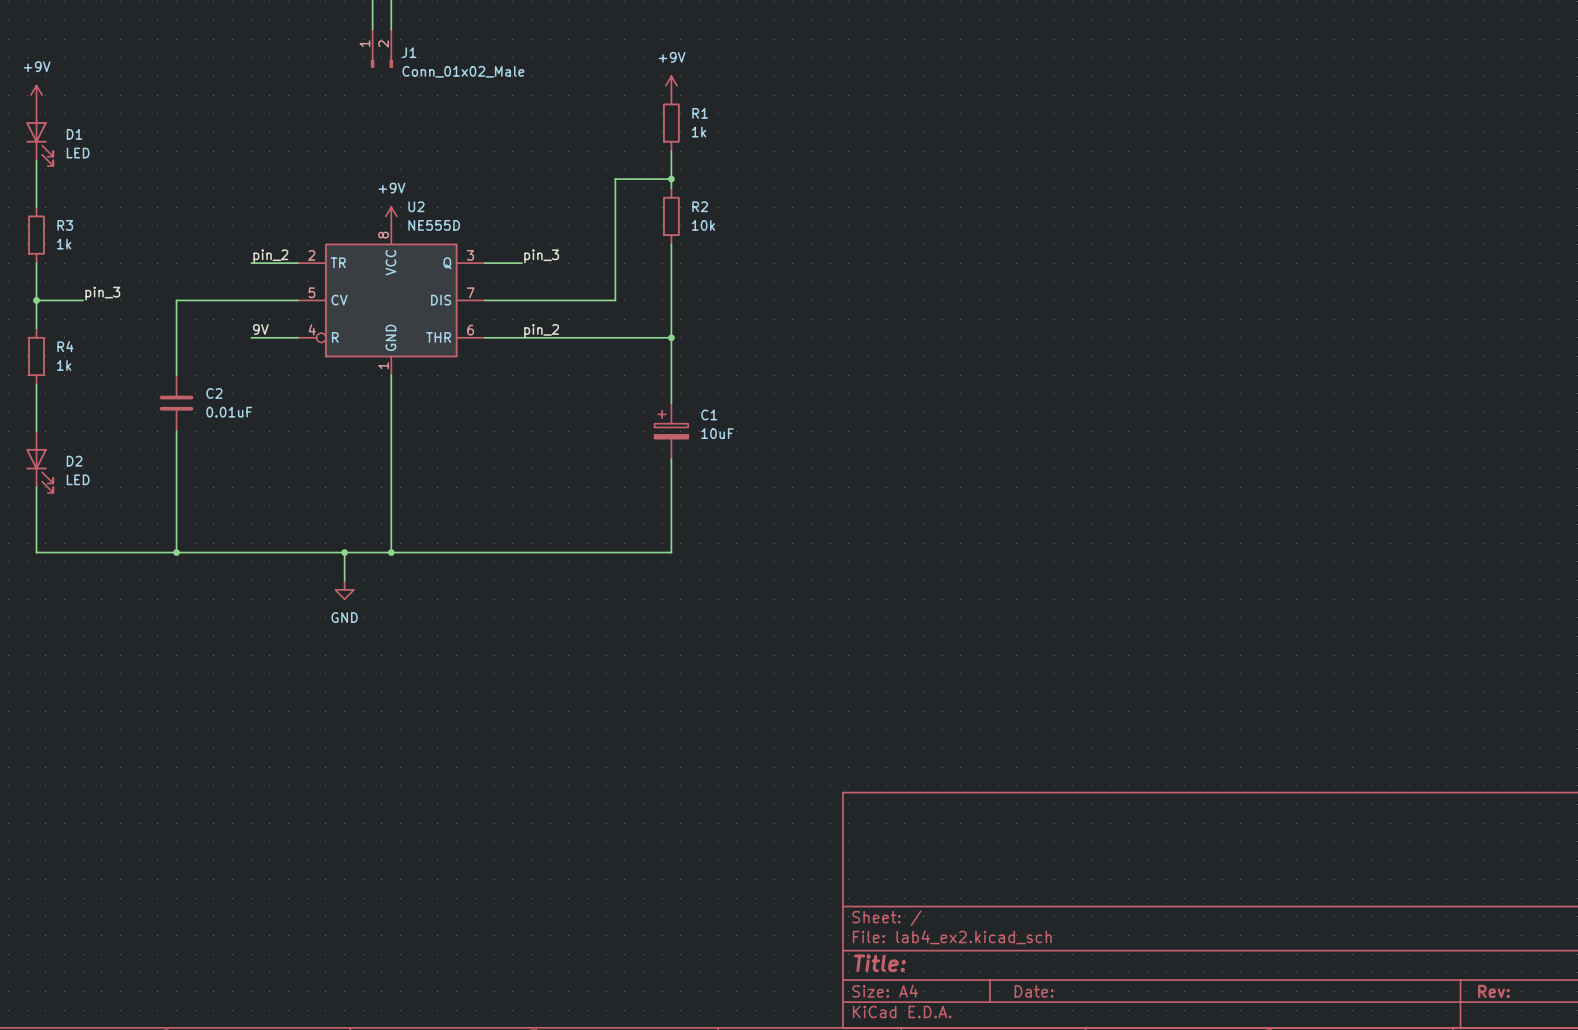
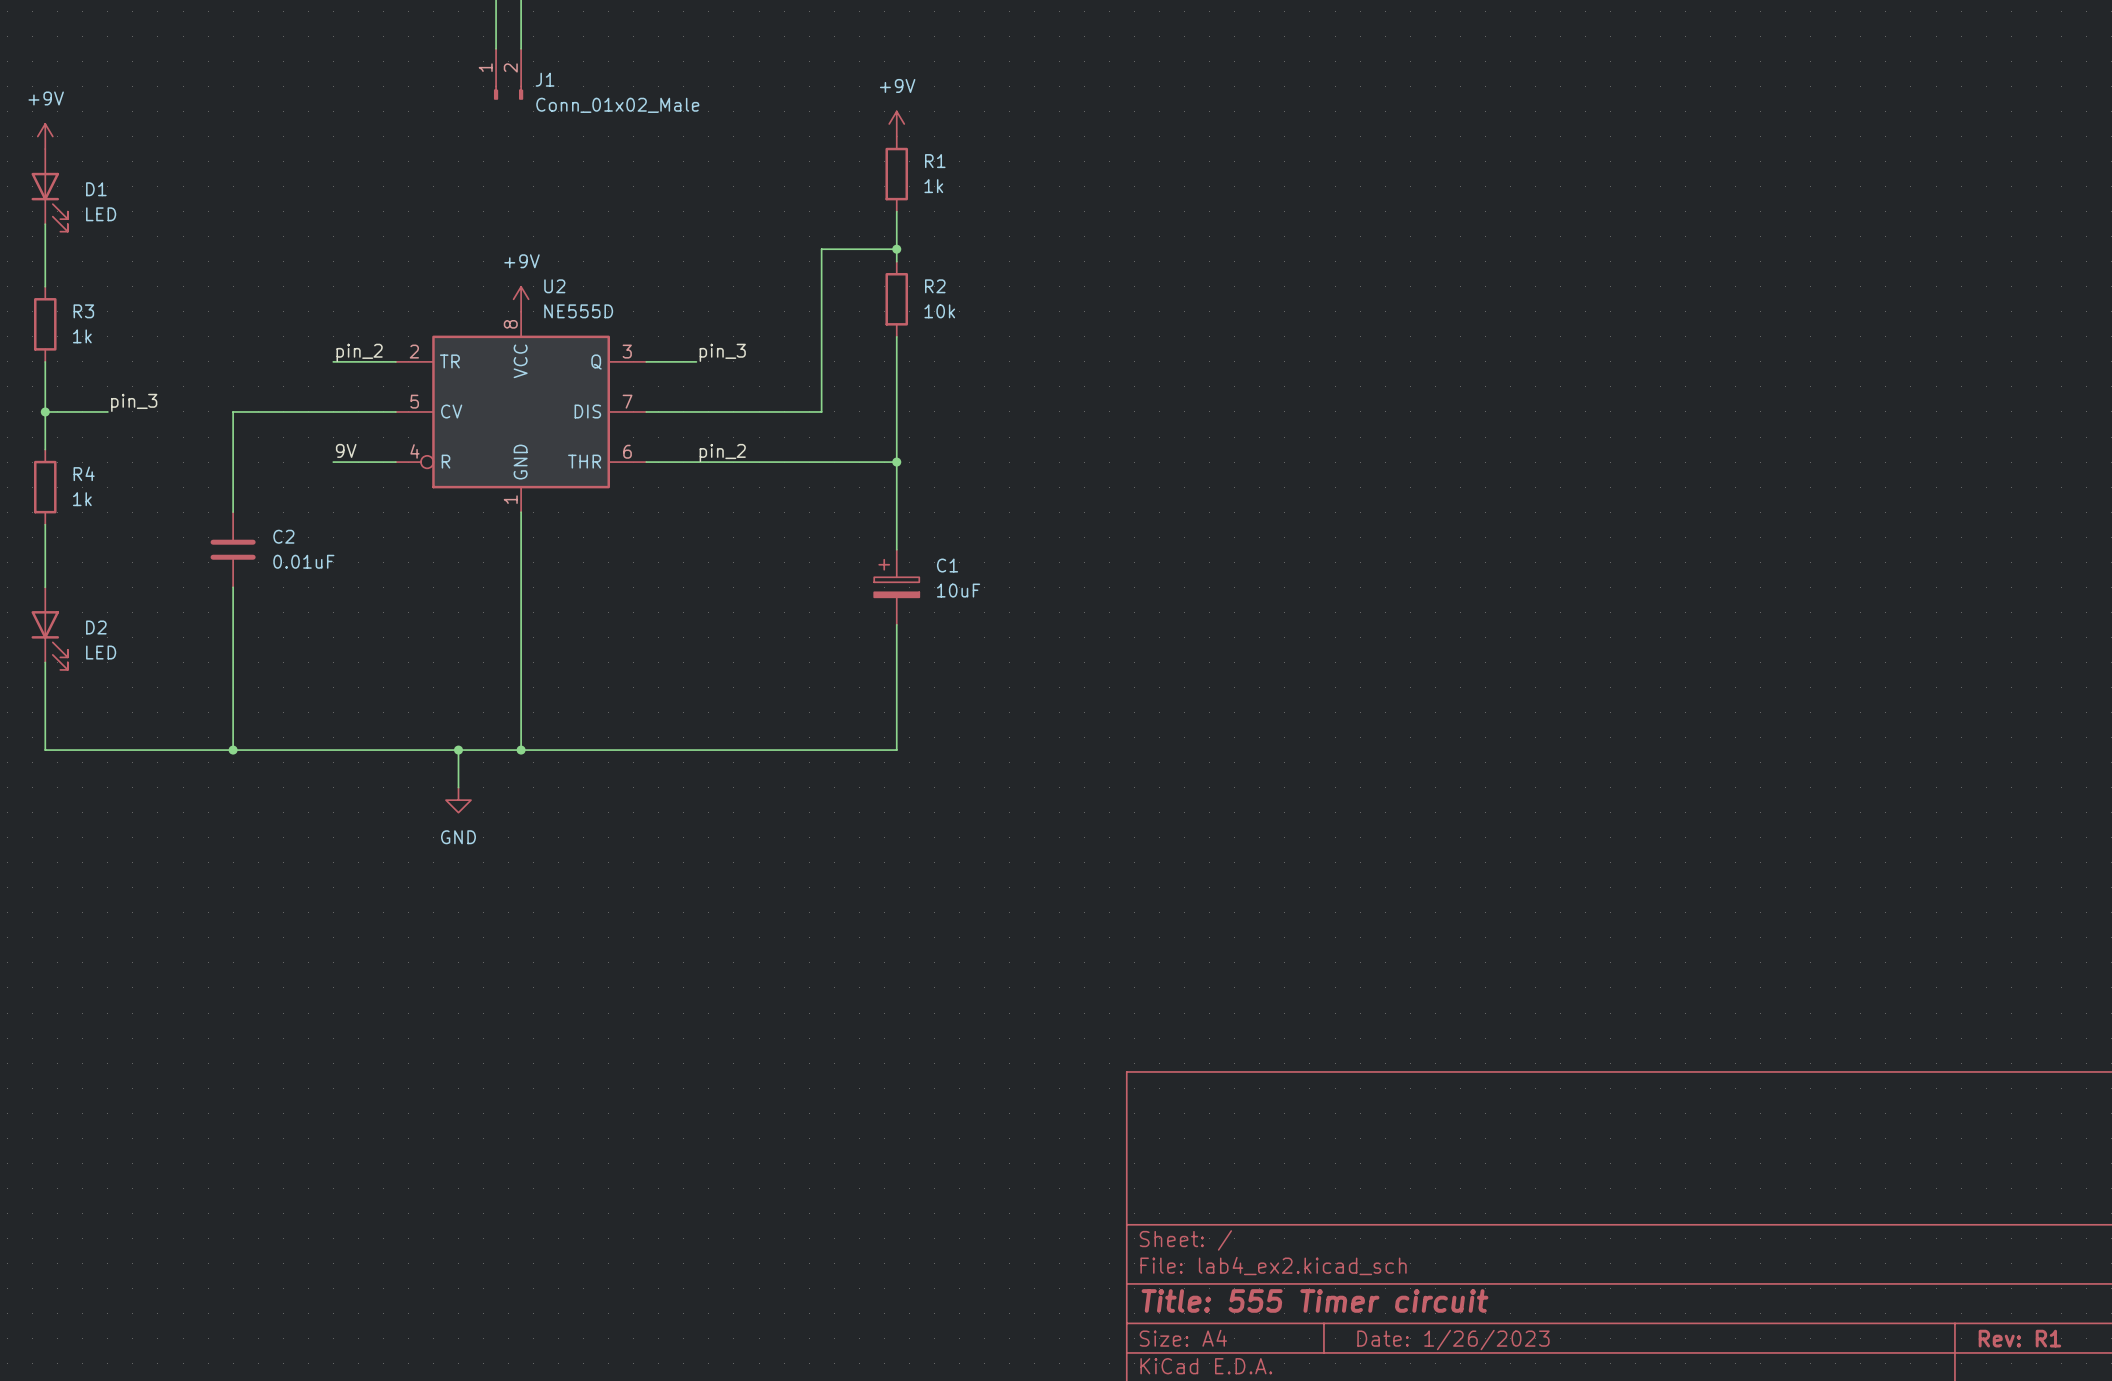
title block: Title: (879, 963) -> Title: 555 Timer circuit (1314, 1300)
title block: Date: (1034, 991) -> Date: 1/26/2023 (1453, 1340)
title block: Rev: (1493, 991) -> Rev: R1 (2019, 1338)

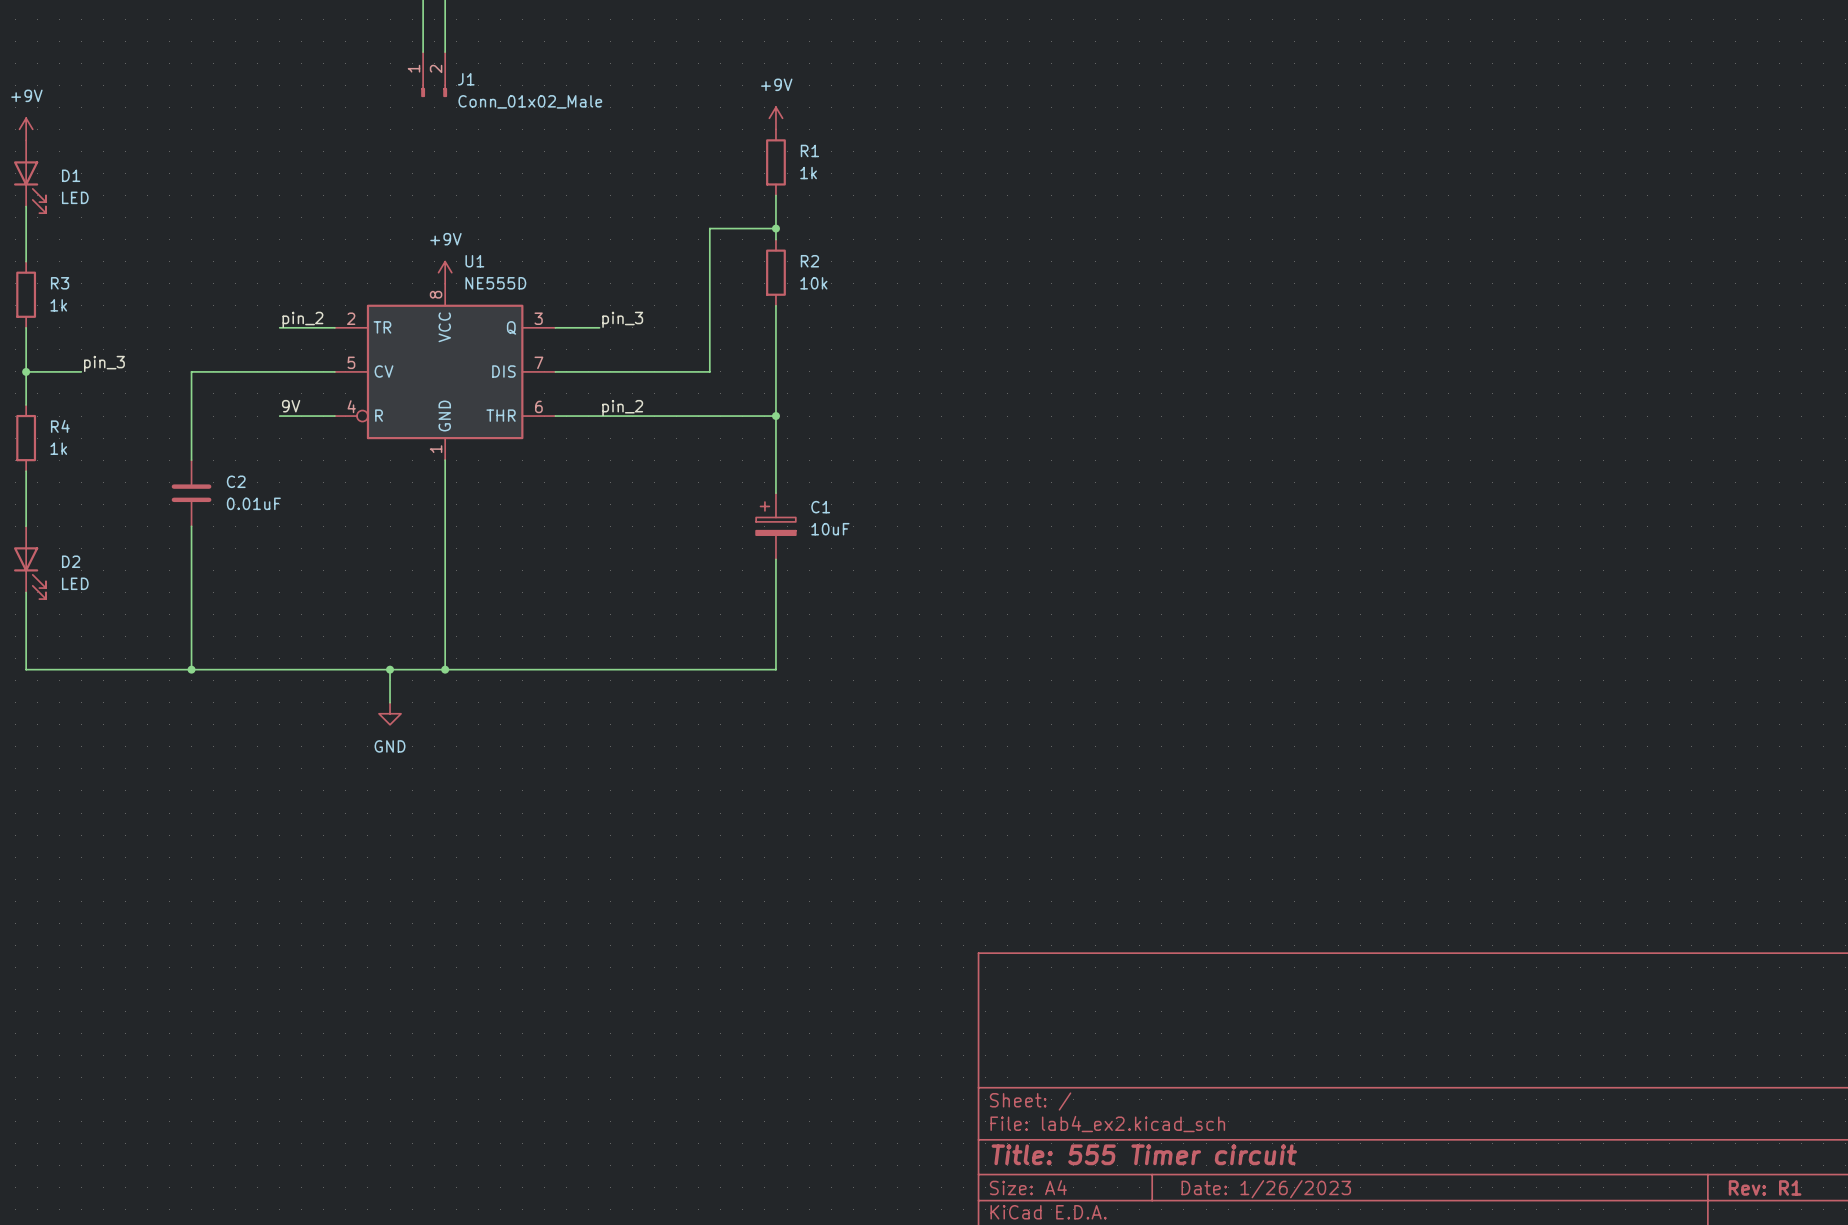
U2 name: U2 (554, 286) -> U1 (474, 261)

